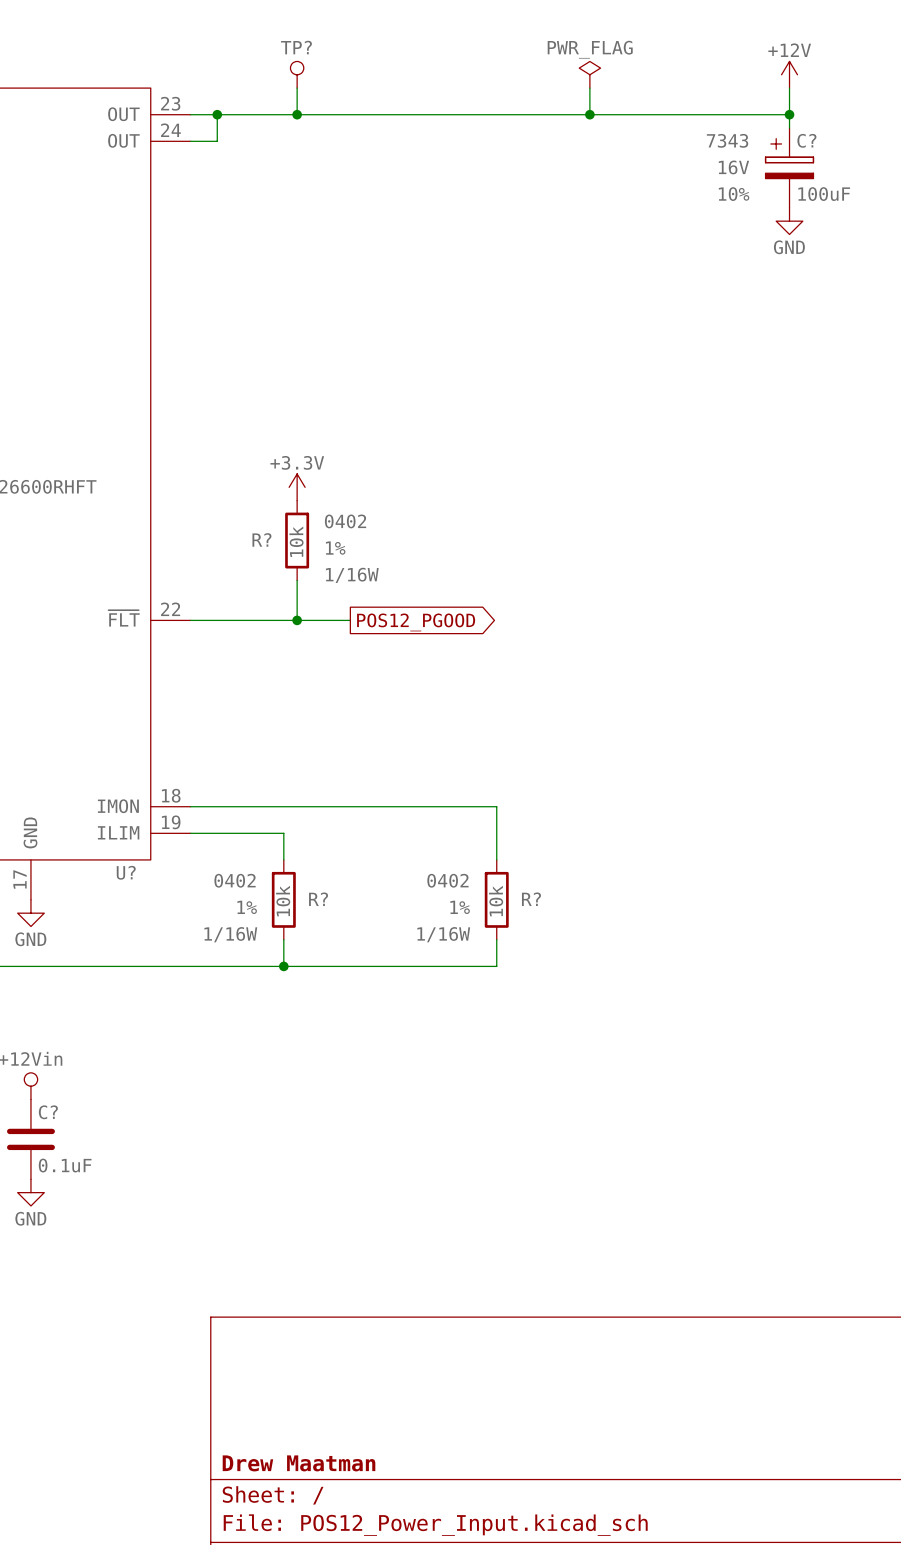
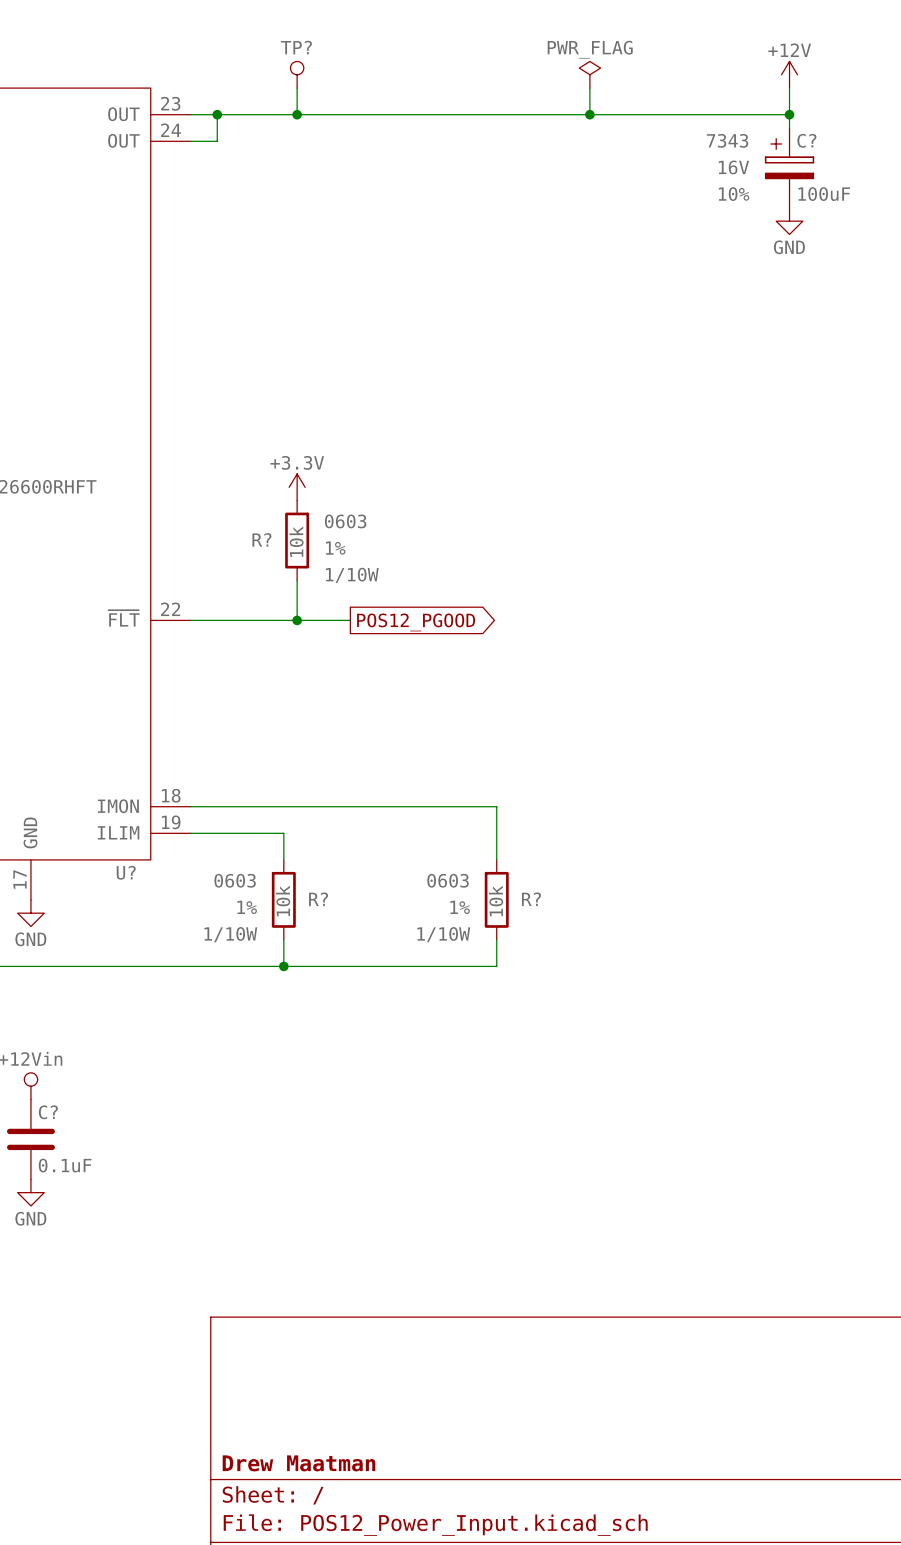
R? text: 0402 (345, 521) -> 0603 (345, 521)
R? text: 1/16W (352, 575) -> 1/10W (352, 575)
R? text: 0402 (235, 880) -> 0603 (235, 880)
R? text: 0402 (447, 880) -> 0603 (448, 880)
R? text: 1/16W (230, 934) -> 1/10W (230, 934)
R? text: 1/16W (443, 934) -> 1/10W (443, 934)

